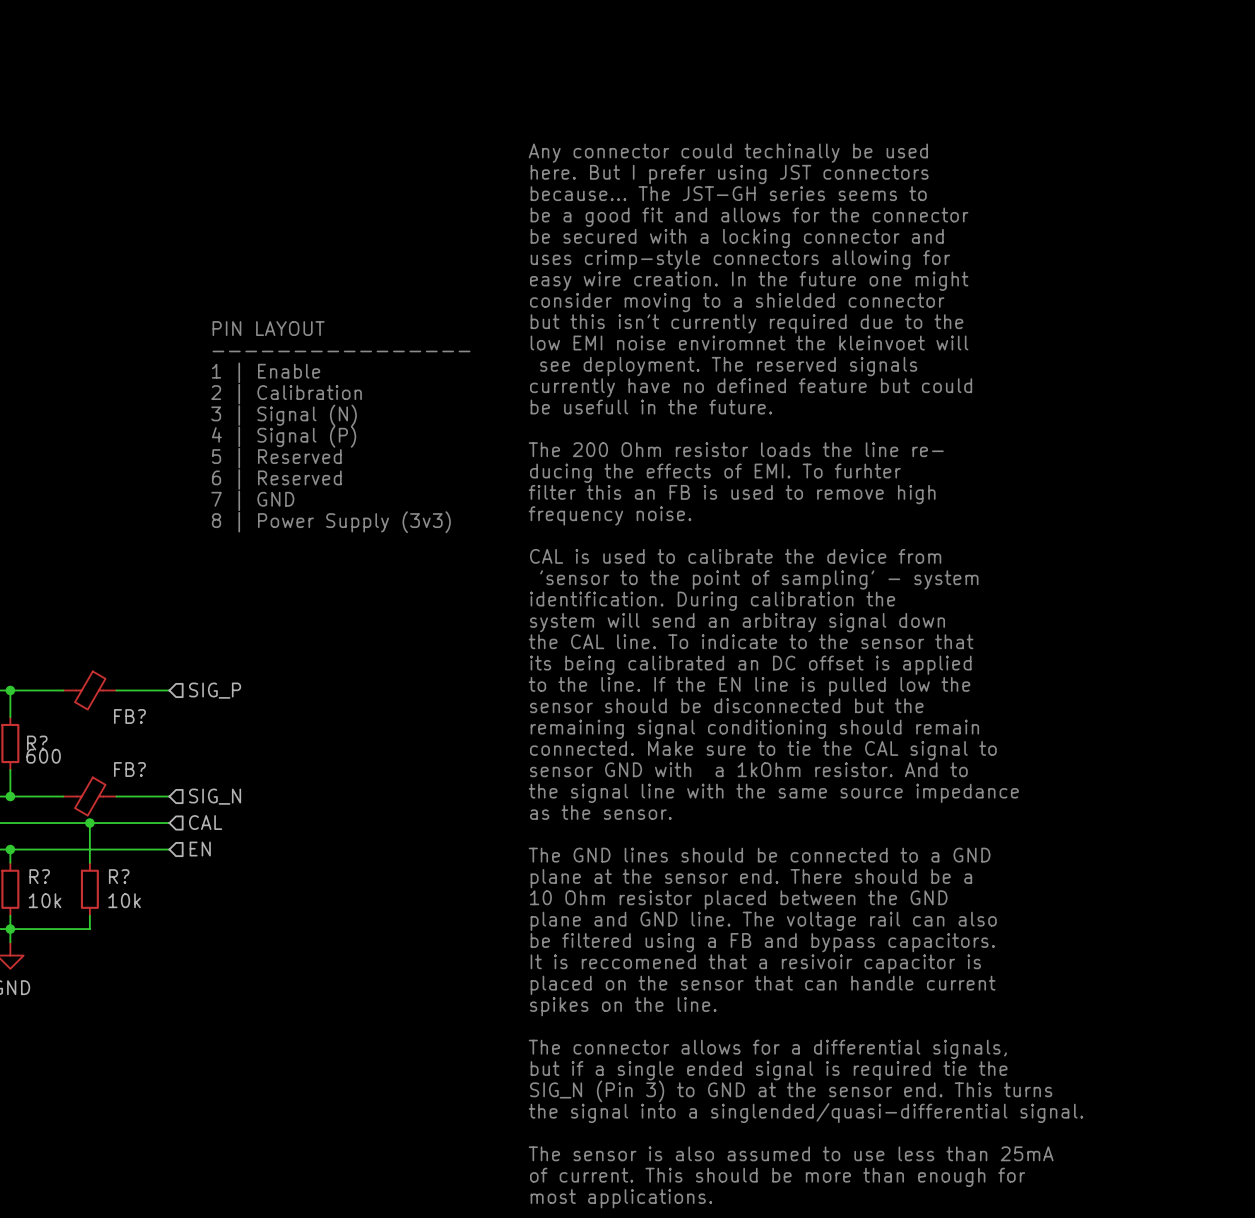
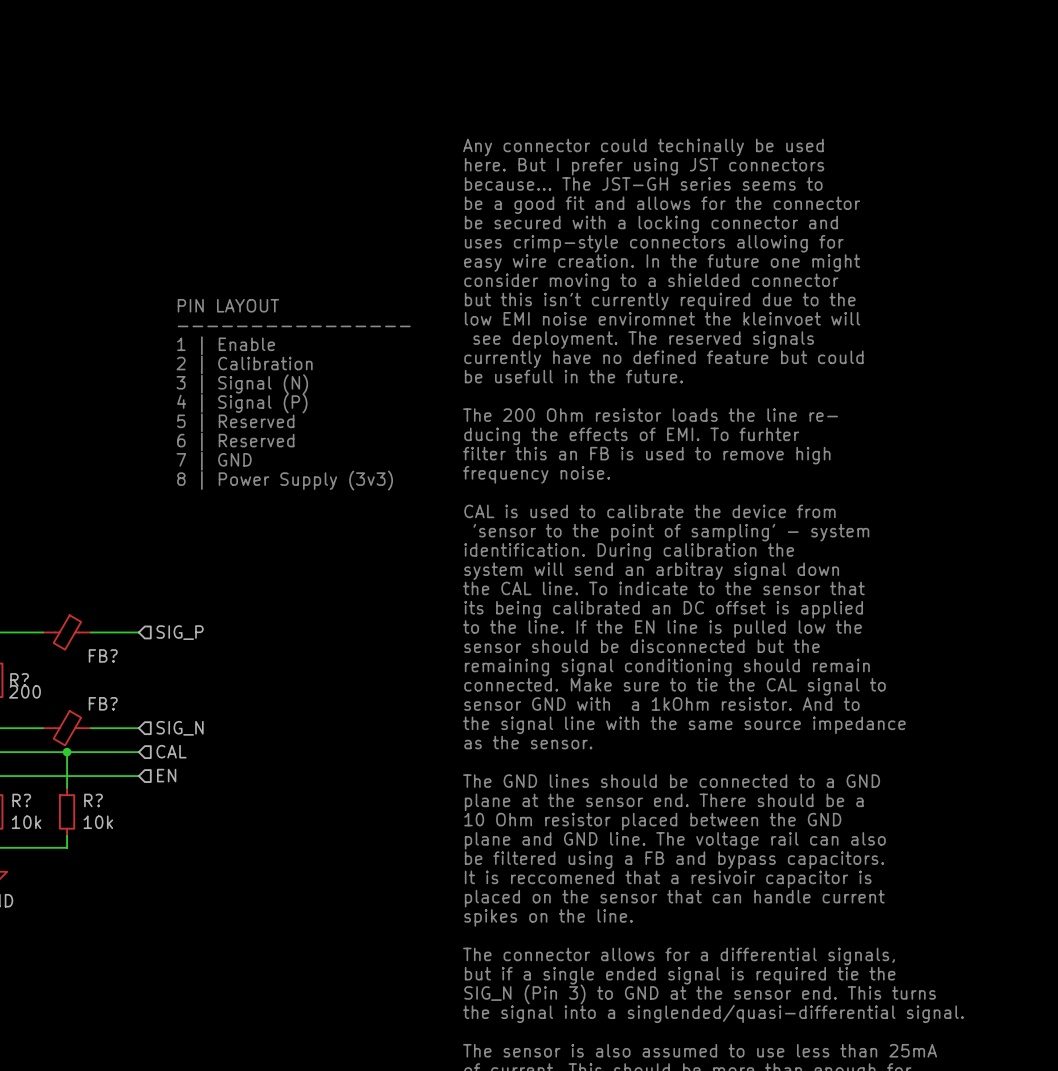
R? value: 600 (43, 756) -> 200 (24, 691)

